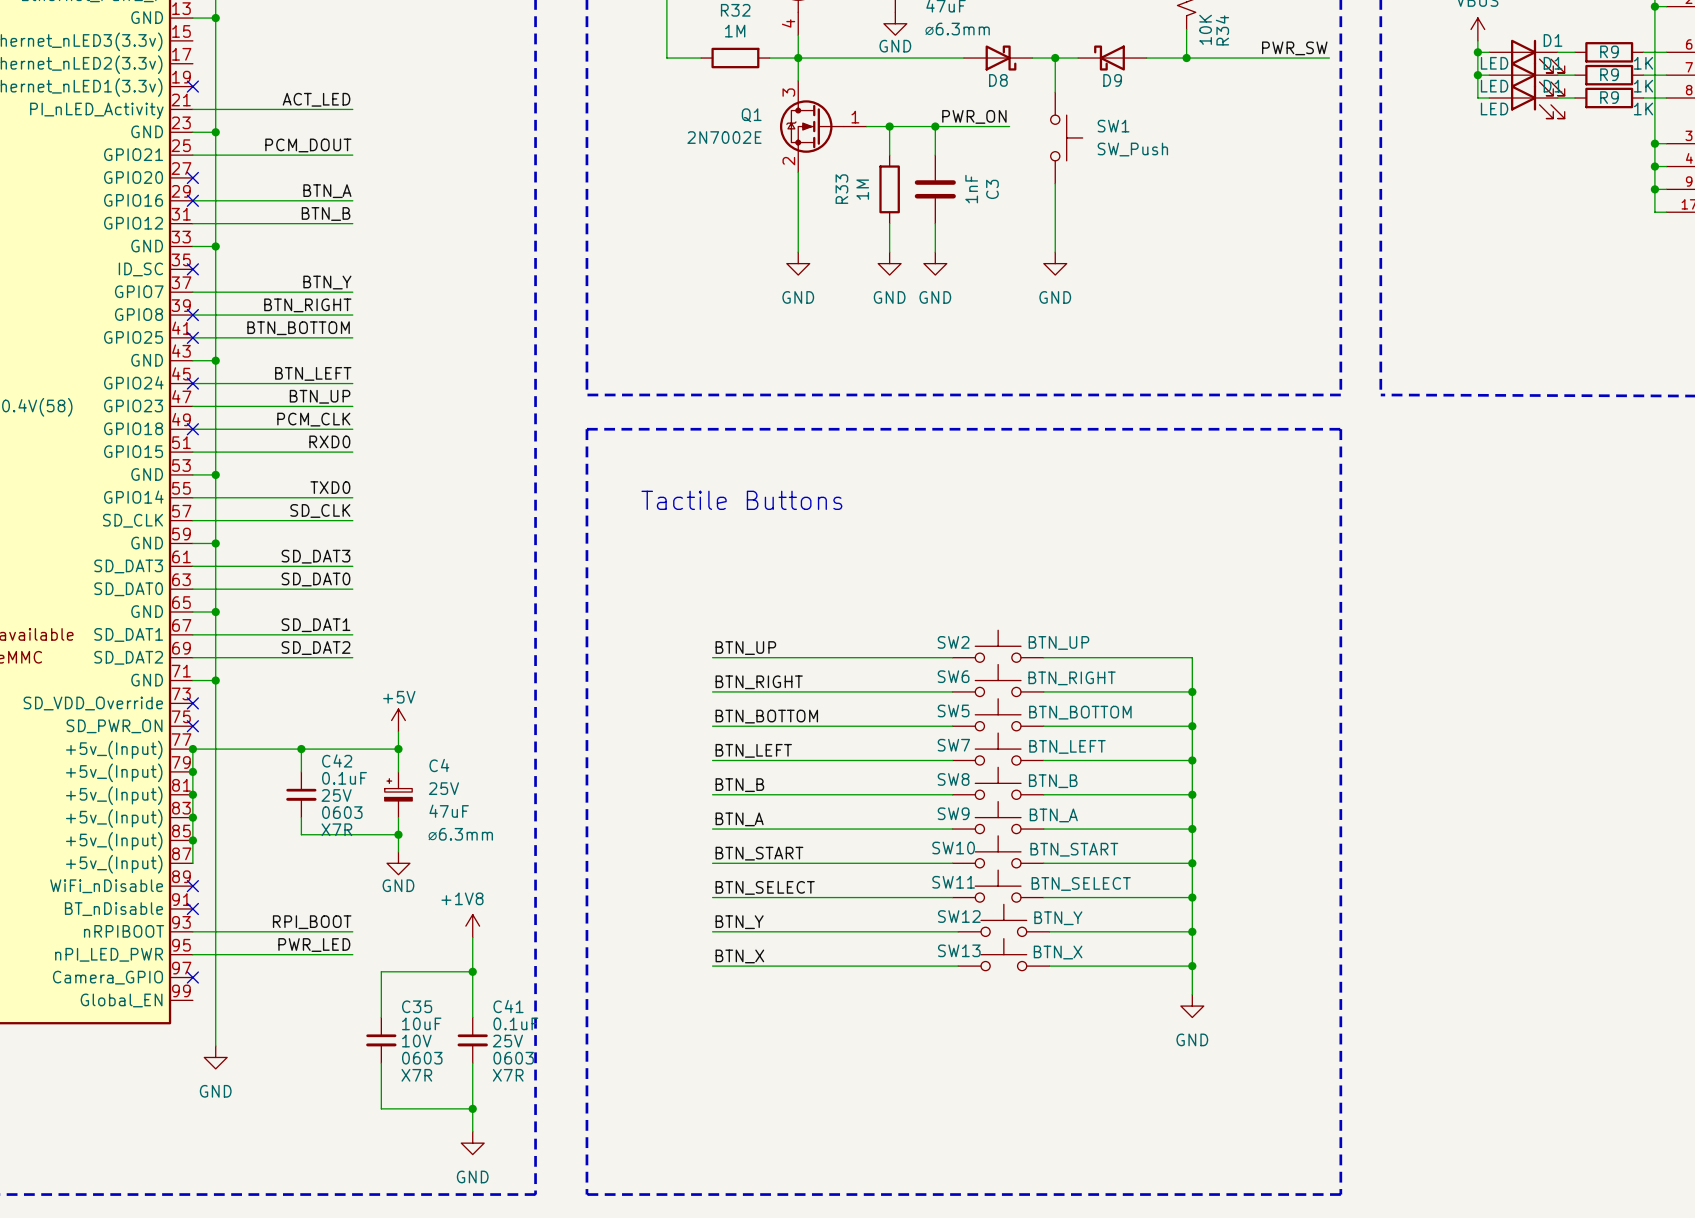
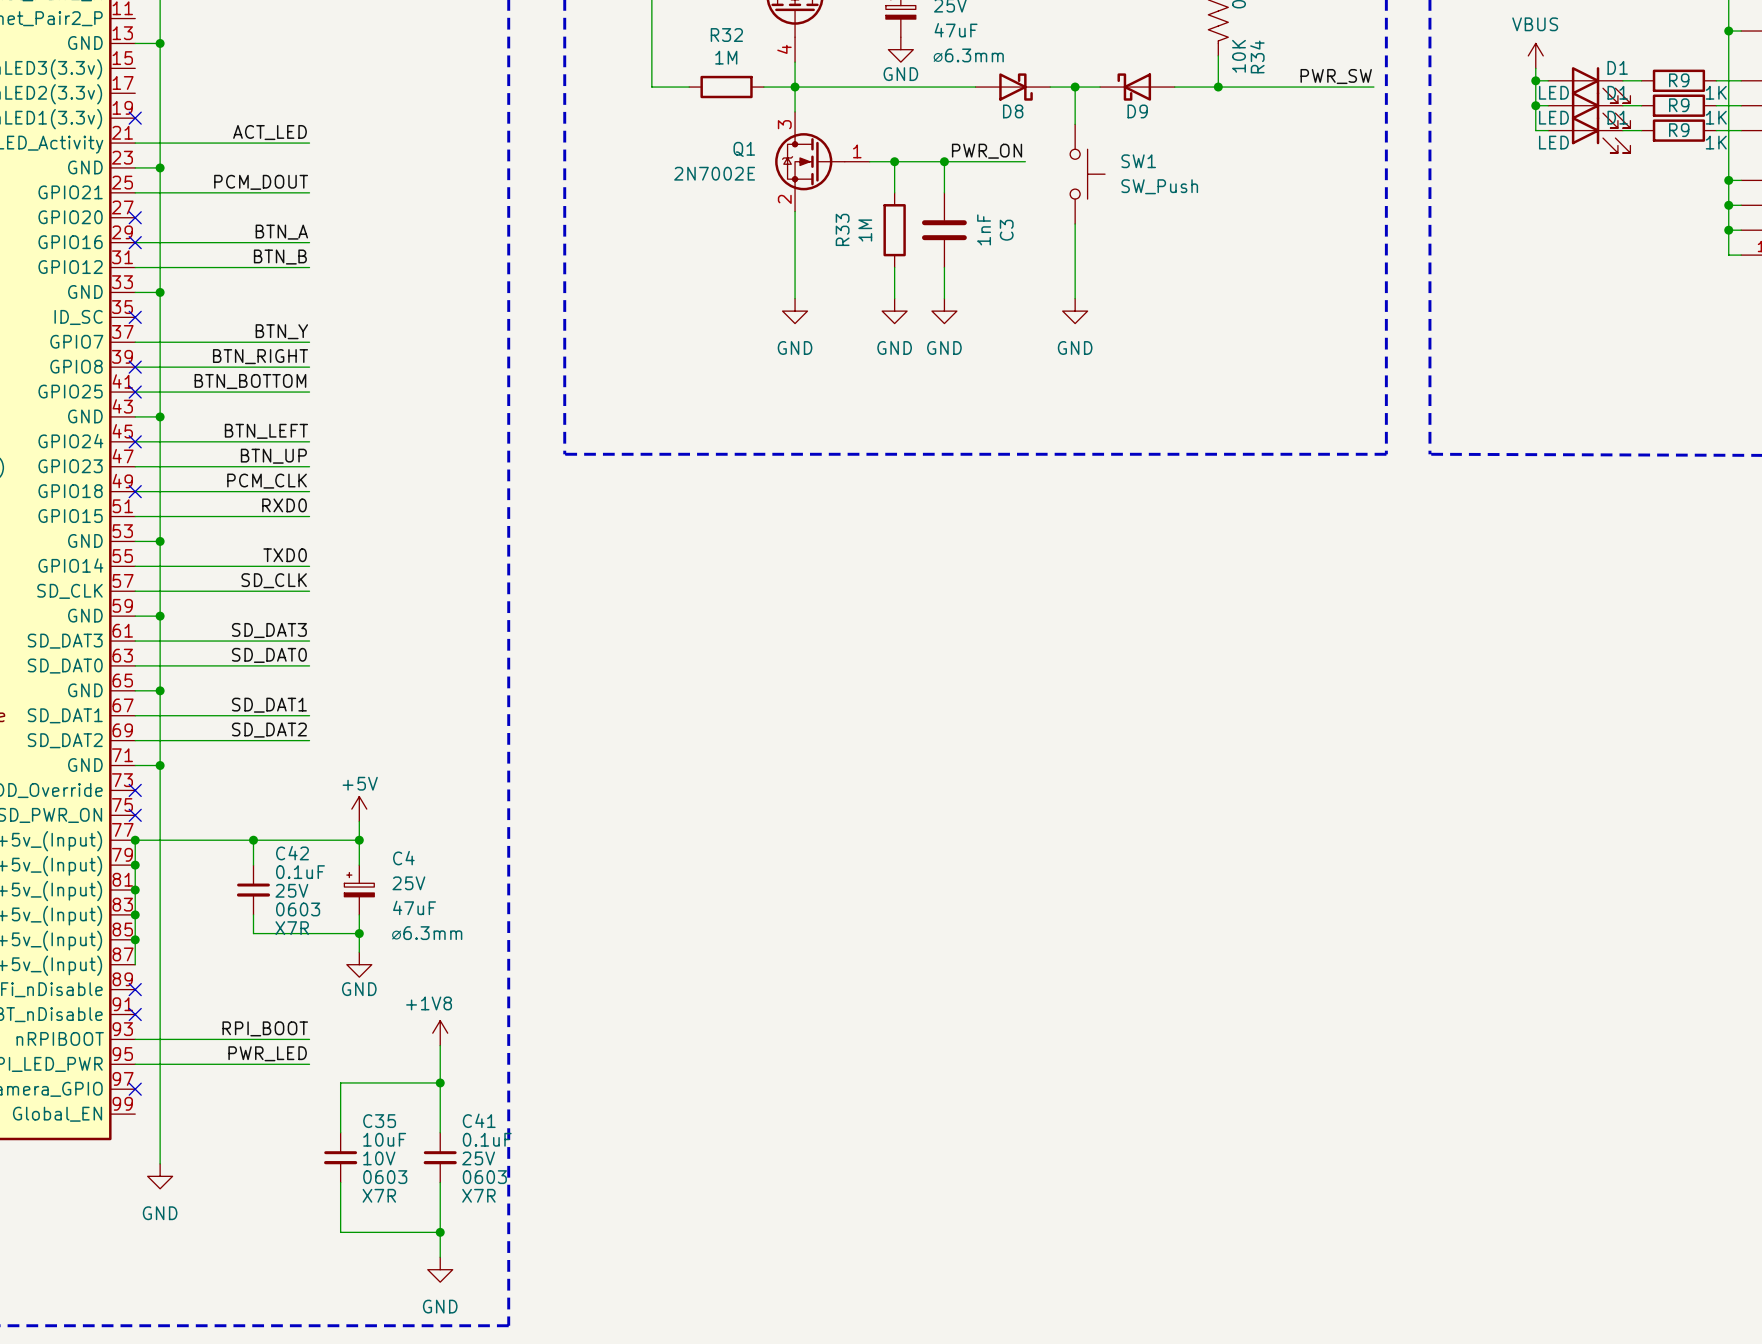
line: (586, 429) (586, 1194) (1340, 1194) (1340, 429) (586, 429) -> none
text: Tactile Buttons (741, 500) -> none
SW2: BTN_UP (998, 646) -> none
label: BTN_UP (745, 648) -> none
wire: (712, 657) (952, 657) -> none
wire: (1043, 657) (1192, 657) (1192, 994) -> none
SW6: BTN_RIGHT (998, 680) -> none
label: BTN_RIGHT (759, 682) -> none
wire: (712, 691) (952, 691) -> none
wire: (1043, 691) (1192, 691) -> none
junction: (1192, 691) -> none
SW5: BTN_BOTTOM (998, 714) -> none
label: BTN_BOTTOM (766, 716) -> none
wire: (712, 726) (952, 726) -> none
wire: (1043, 726) (1192, 726) -> none
junction: (1192, 726) -> none
SW7: BTN_LEFT (998, 749) -> none
label: BTN_LEFT (753, 750) -> none
wire: (712, 760) (952, 760) -> none
wire: (1043, 760) (1192, 760) -> none
junction: (1192, 760) -> none
SW8: BTN_B (998, 783) -> none
label: BTN_B (739, 785) -> none
wire: (712, 794) (952, 794) -> none
wire: (1043, 794) (1192, 794) -> none
junction: (1192, 794) -> none
SW9: BTN_A (998, 817) -> none
label: BTN_A (739, 819) -> none
wire: (712, 829) (952, 829) -> none
wire: (1043, 829) (1192, 829) -> none
junction: (1192, 829) -> none
SW10: BTN_START (998, 851) -> none
label: BTN_START (759, 853) -> none
wire: (712, 863) (952, 863) -> none
wire: (1043, 863) (1192, 863) -> none
junction: (1192, 863) -> none
SW11: BTN_SELECT (998, 886) -> none
label: BTN_SELECT (765, 887) -> none
wire: (712, 897) (952, 897) -> none
wire: (1043, 897) (1192, 897) -> none
junction: (1192, 897) -> none
SW12: BTN_Y (1003, 920) -> none
label: BTN_Y (739, 922) -> none
wire: (712, 931) (958, 931) -> none
wire: (1049, 931) (1192, 931) -> none
junction: (1192, 931) -> none
SW13: BTN_X (1003, 954) -> none
label: BTN_X (739, 956) -> none
wire: (712, 966) (958, 966) -> none
wire: (1049, 966) (1192, 966) -> none
junction: (1192, 966) -> none
power symbol: GND (1192, 1006) -> none

